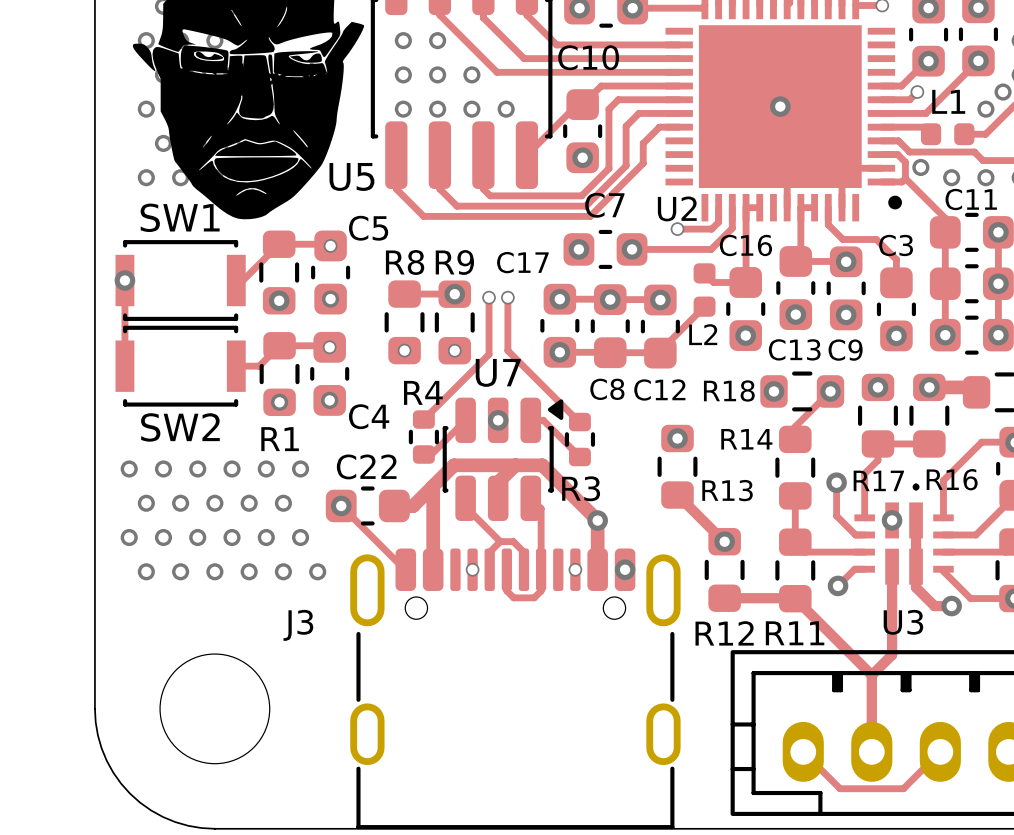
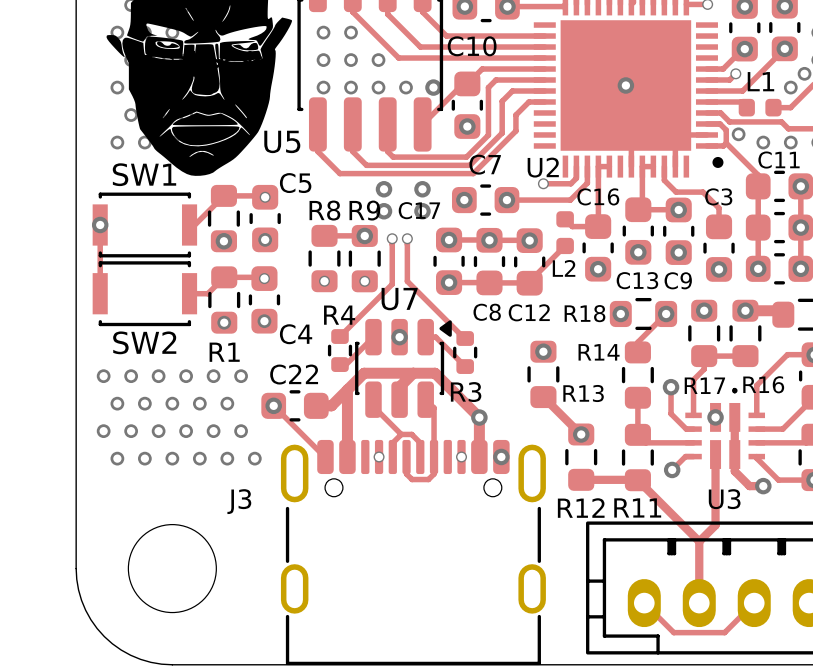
via: none -> (433, 87)
via: none -> (384, 189)
via: none -> (422, 189)
via: none -> (384, 211)
via: none -> (422, 211)

